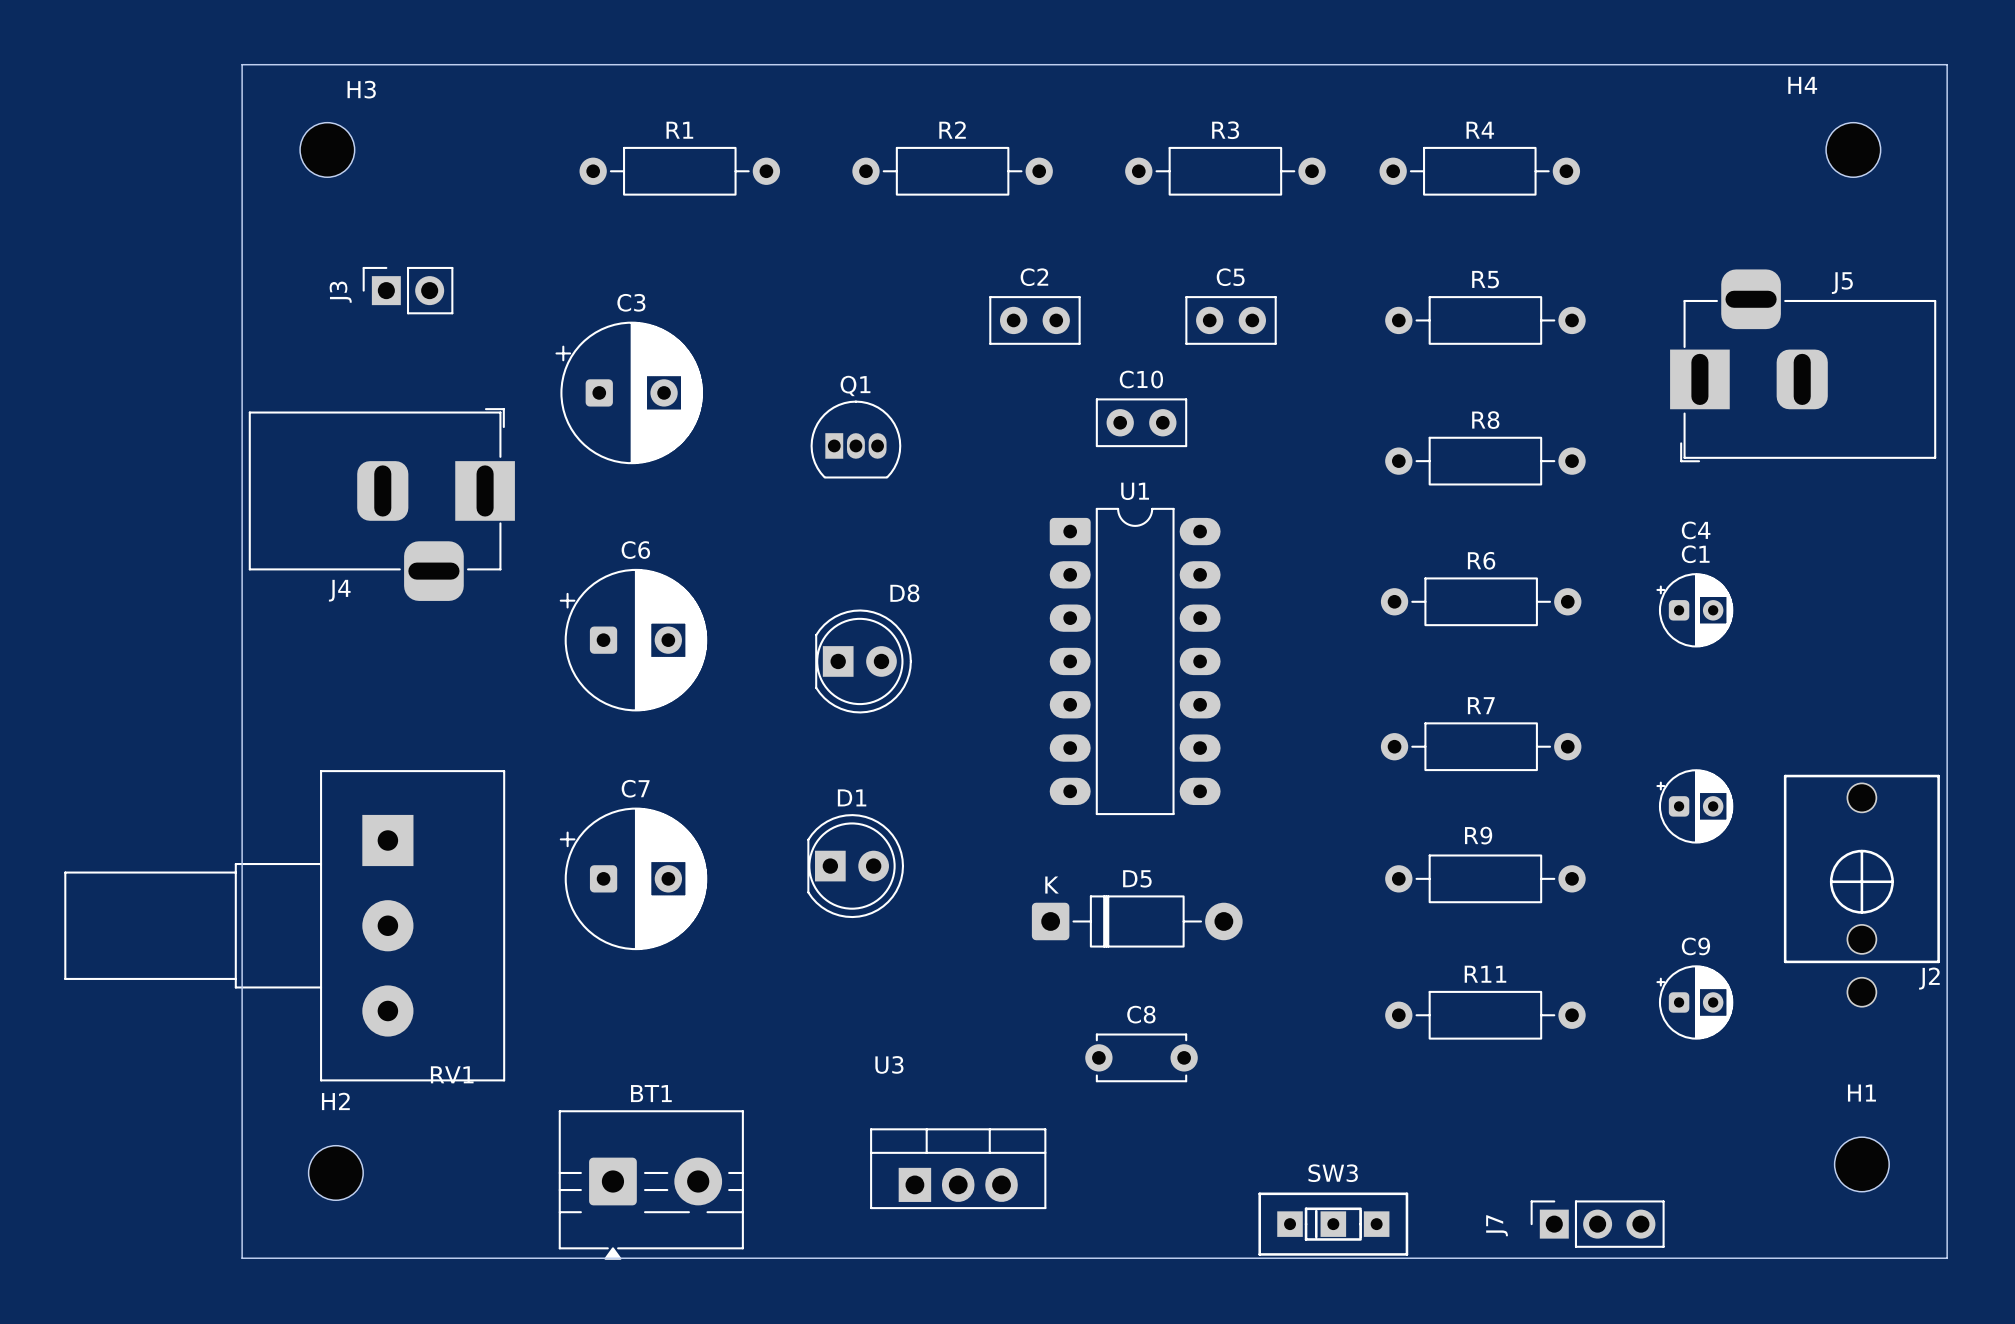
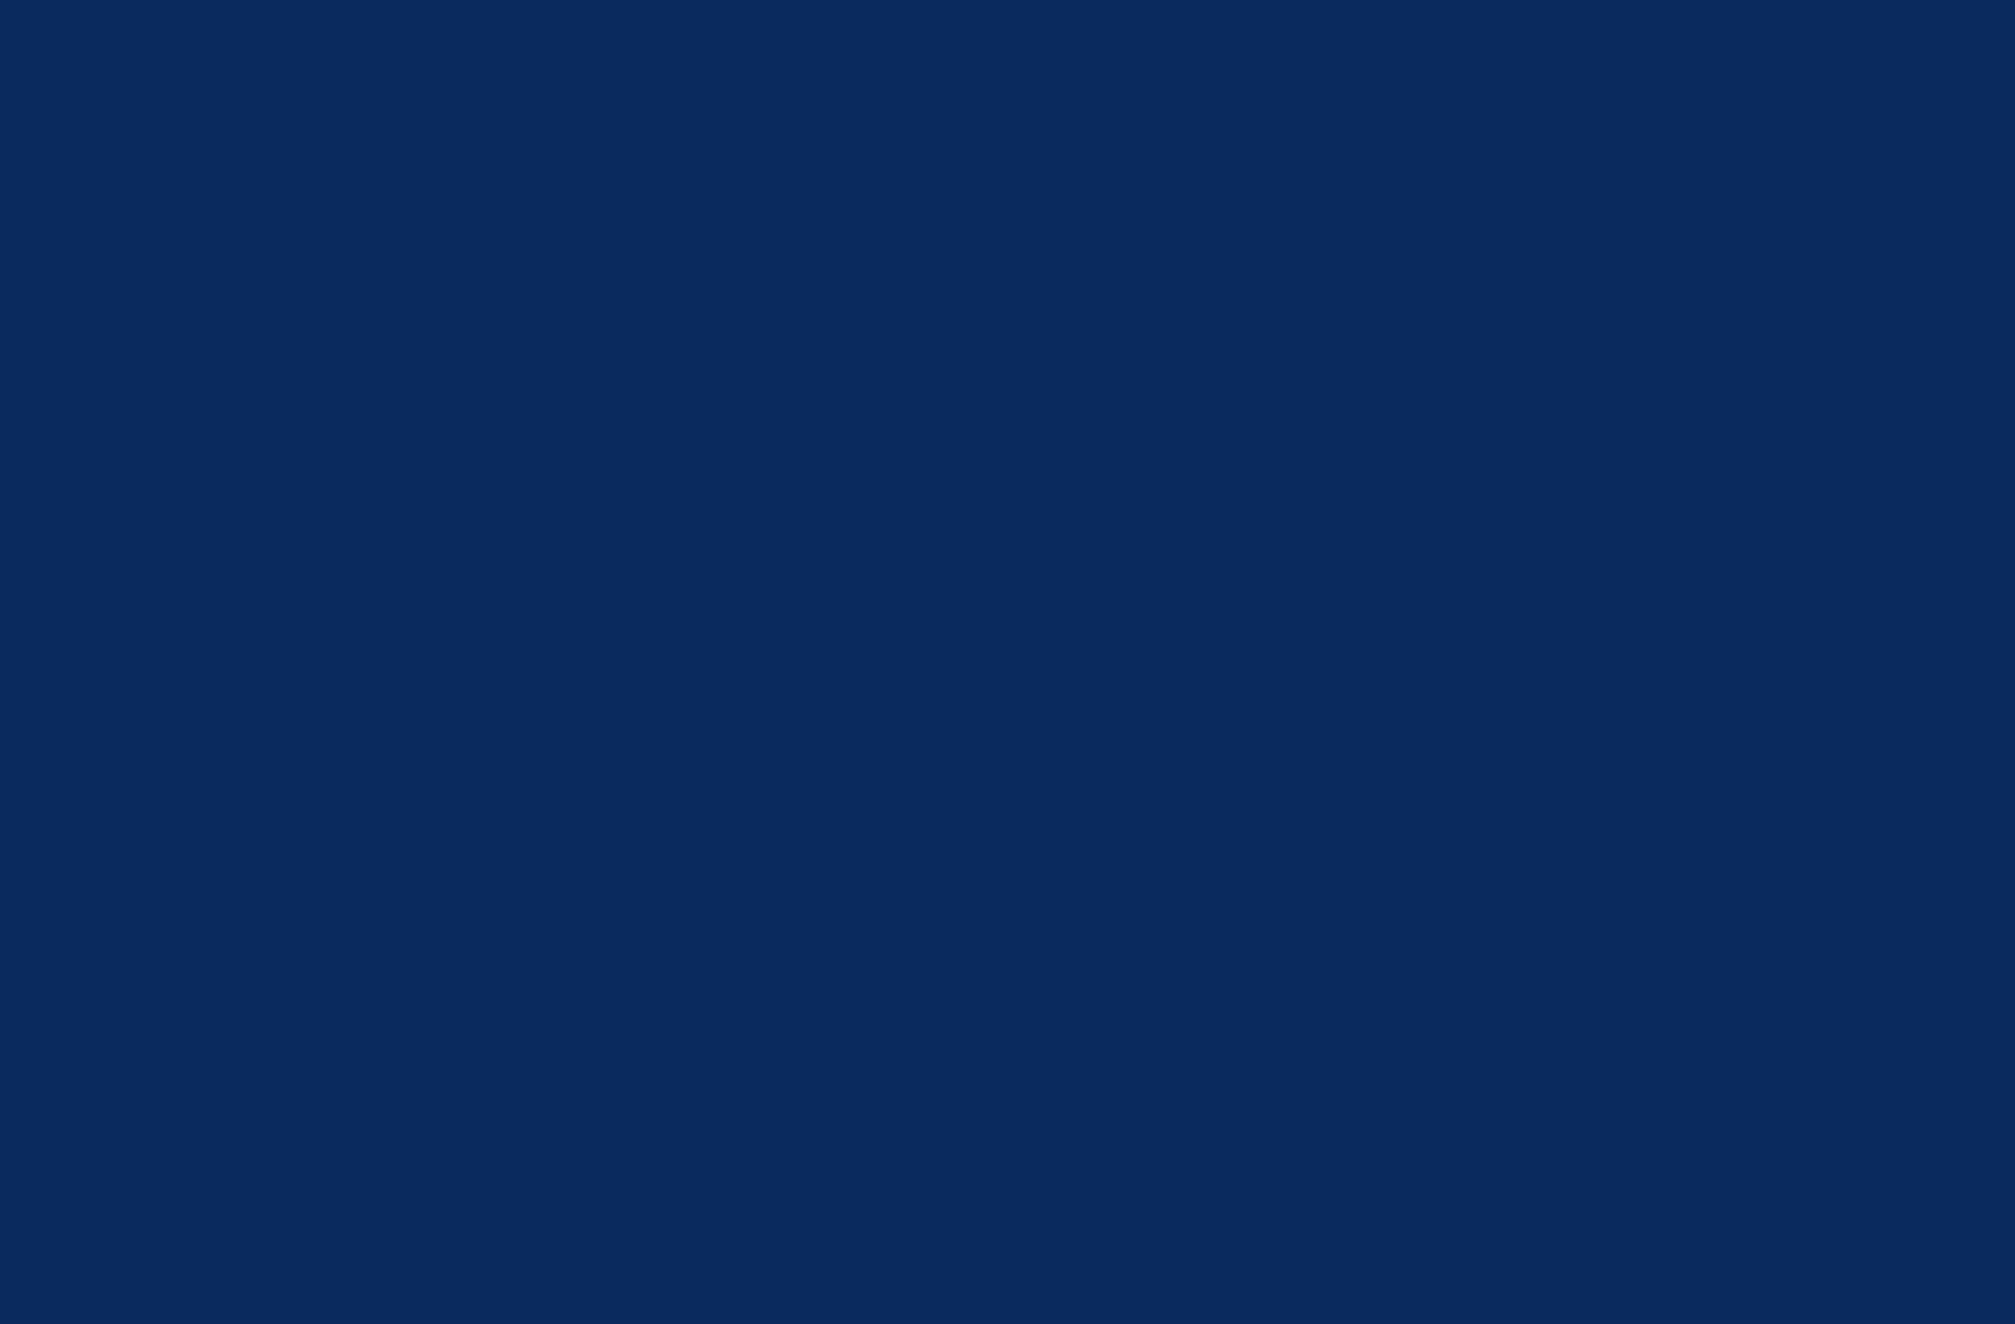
board edge: (242, 64) (1947, 64) (1947, 1258) (242, 1258) (242, 64) -> none
H3: (327, 149) -> none
H4: (1853, 149) -> none
R1: (679, 171) -> none
R2: (952, 171) -> none
R3: (1225, 171) -> none
R4: (1479, 171) -> none
J3: (408, 290) -> none
C2: (1034, 320) -> none
C5: (1231, 320) -> none
R5: (1485, 320) -> none
J5: (1803, 365) -> none
C3: (629, 392) -> none
C10: (1141, 422) -> none
Q1: (855, 439) -> none
R8: (1485, 461) -> none
J4: (381, 504) -> none
R6: (1481, 601) -> none
C1: (1694, 610) -> none
C6: (633, 640) -> none
D8: (863, 661) -> none
U1: (1135, 661) -> none
R7: (1481, 746) -> none
C4: (1694, 806) -> none
D1: (855, 866) -> none
C7: (633, 878) -> none
R9: (1485, 878) -> none
J2: (1861, 891) -> none
D5: (1137, 921) -> none
RV1: (284, 925) -> none
C9: (1694, 1002) -> none
R11: (1485, 1015) -> none
C8: (1141, 1057) -> none
H1: (1861, 1164) -> none
U3: (958, 1168) -> none
H2: (335, 1172) -> none
BT1: (651, 1184) -> none
SW3: (1333, 1224) -> none
J7: (1597, 1224) -> none

